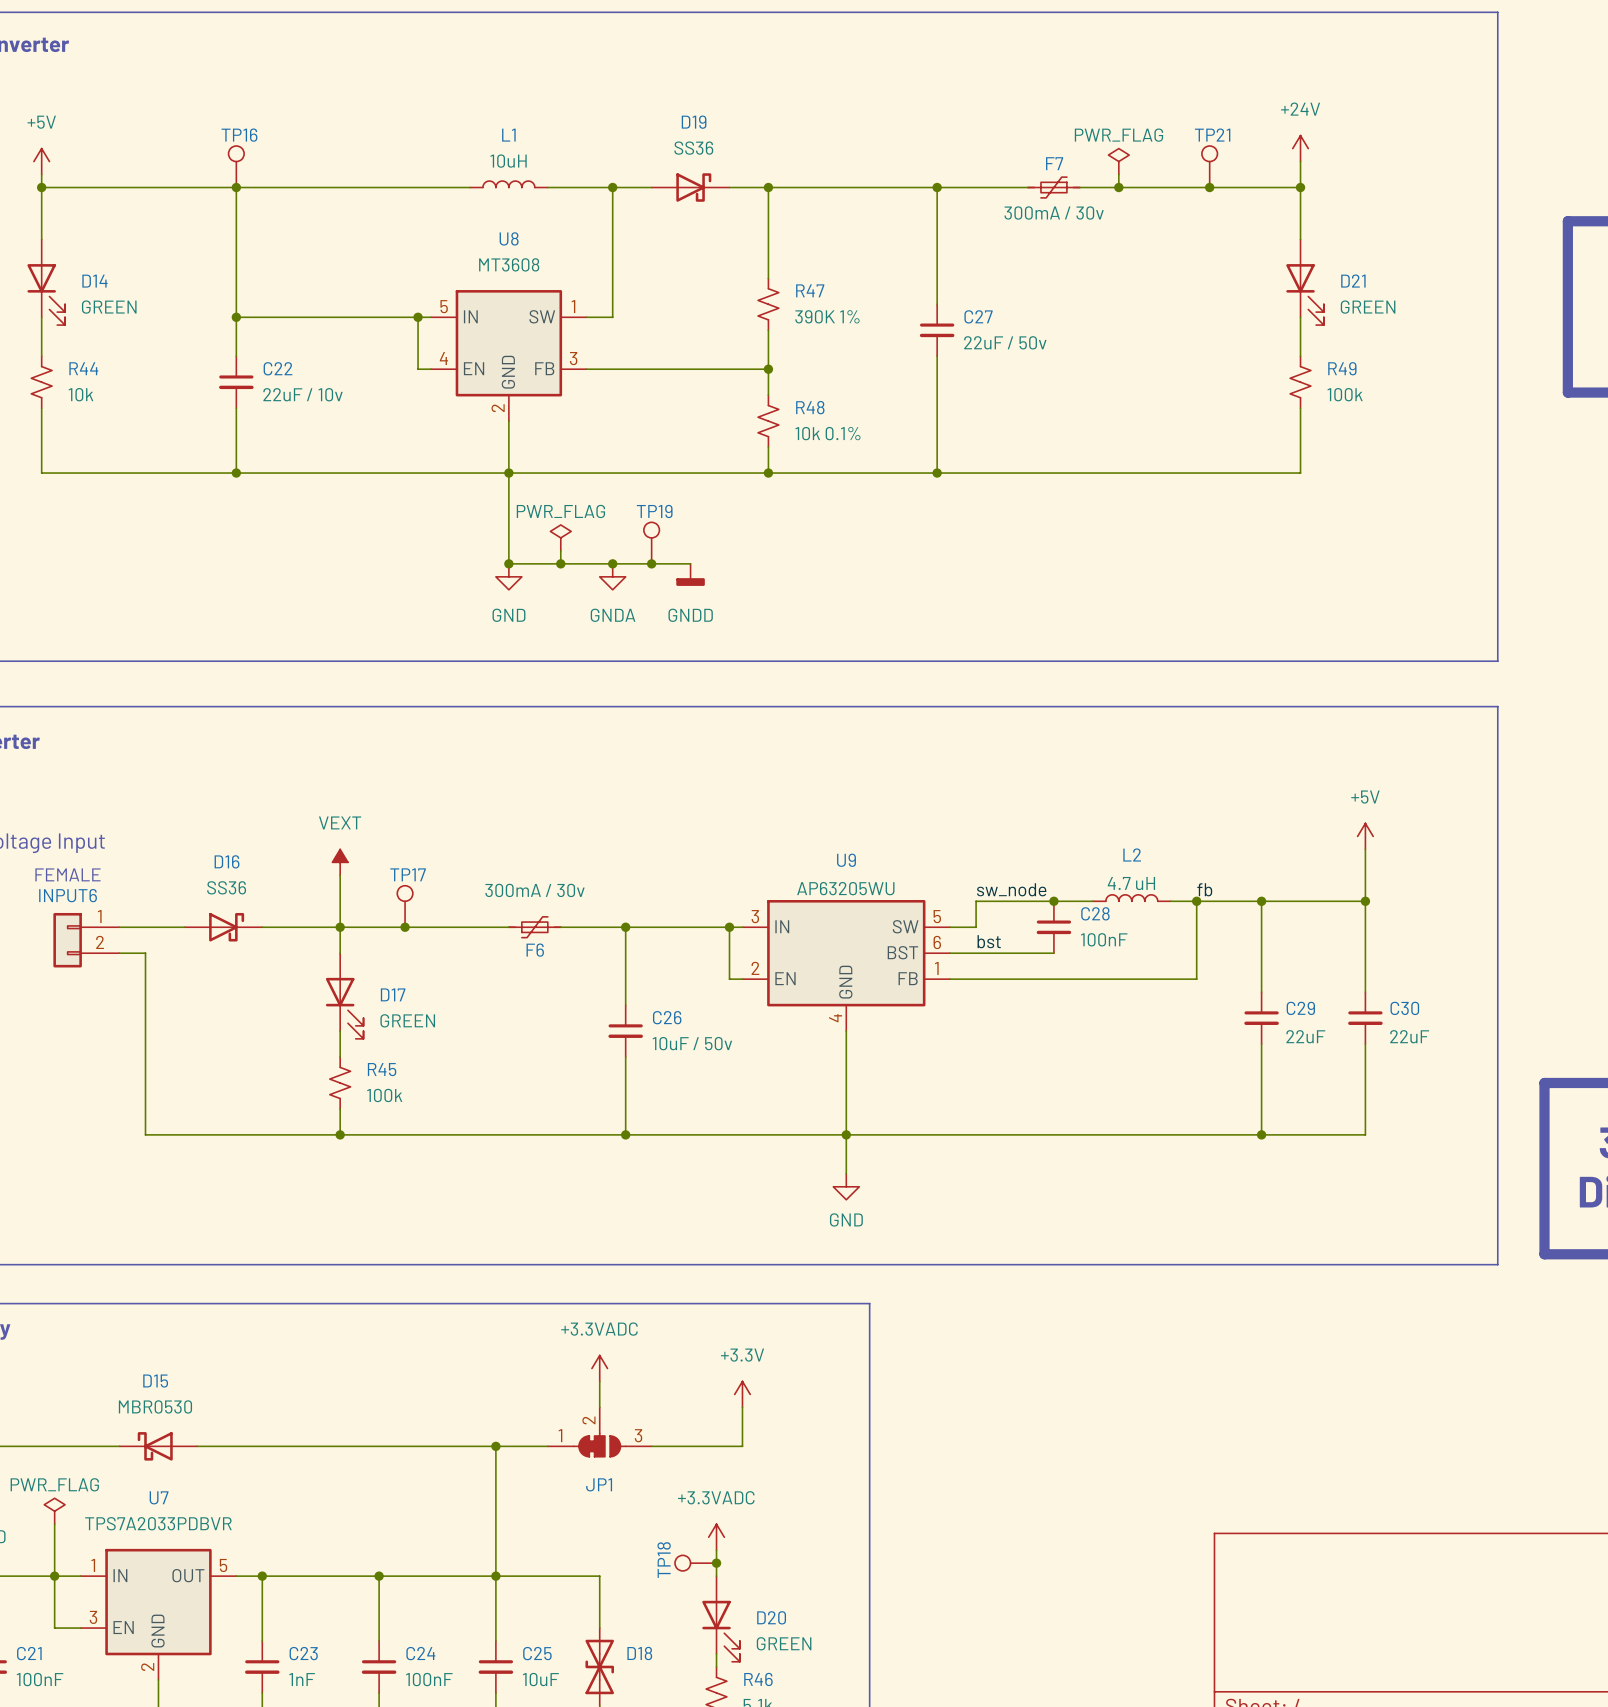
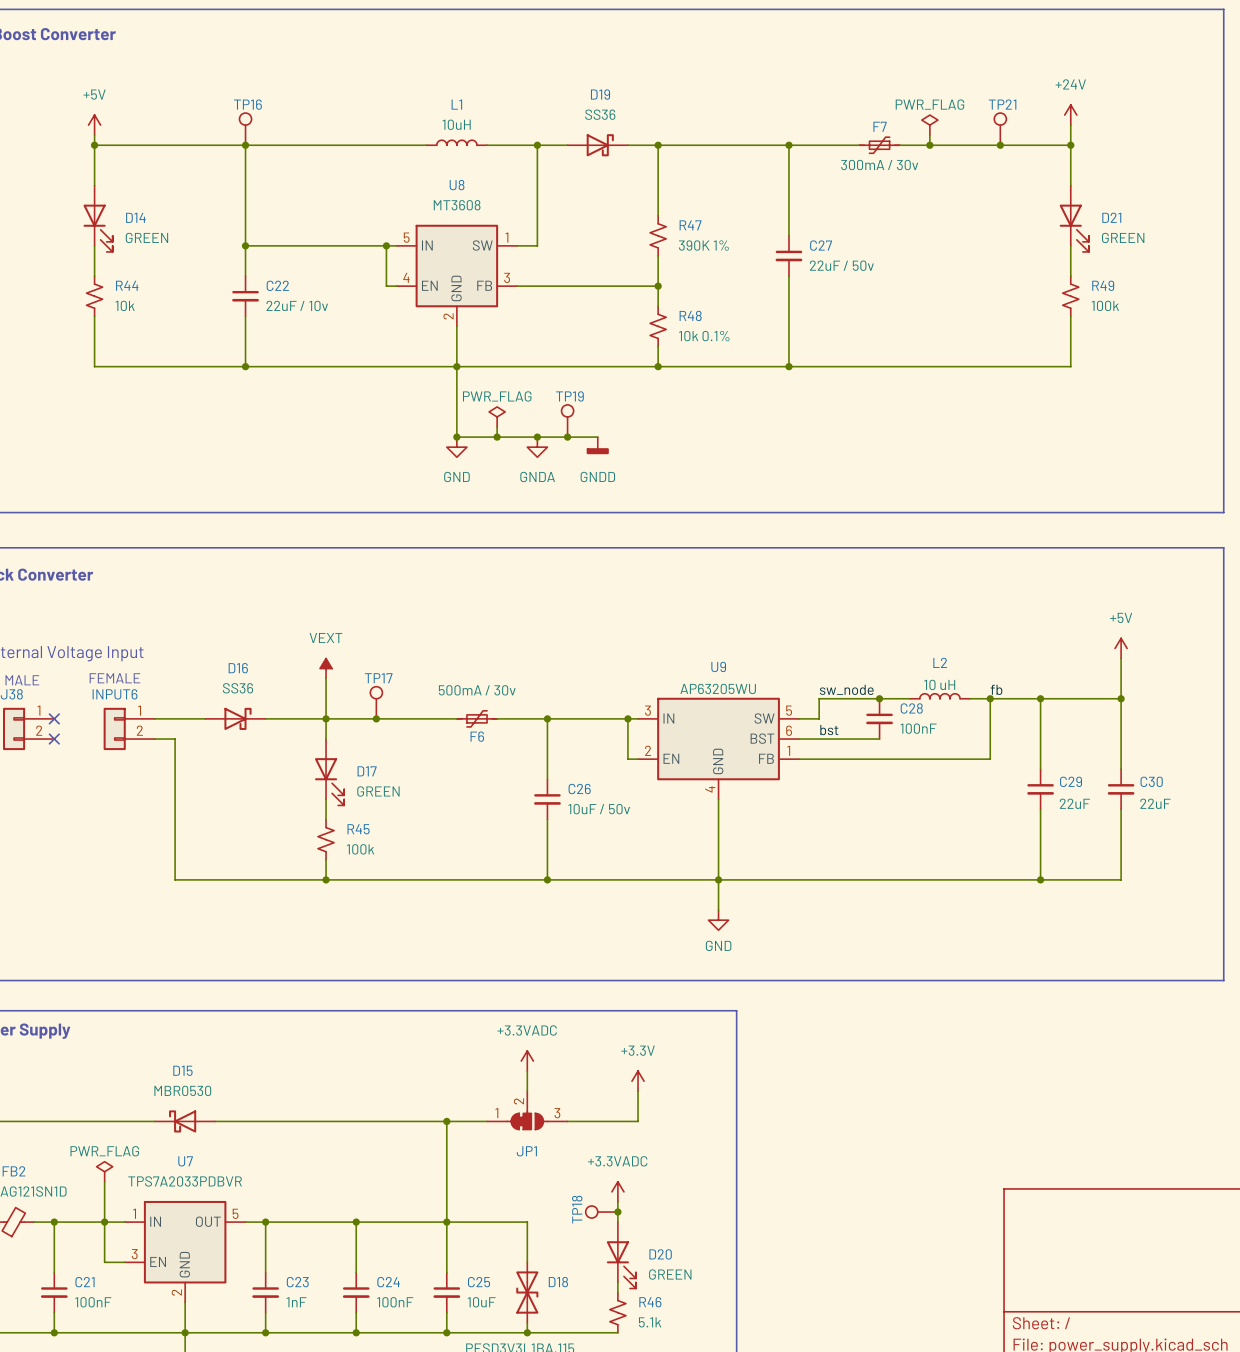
L2 value: 4.7 uH (1131, 883) -> 10 uH (939, 684)
F6 value: 300mA / 30v (535, 890) -> 500mA / 30v (477, 690)

